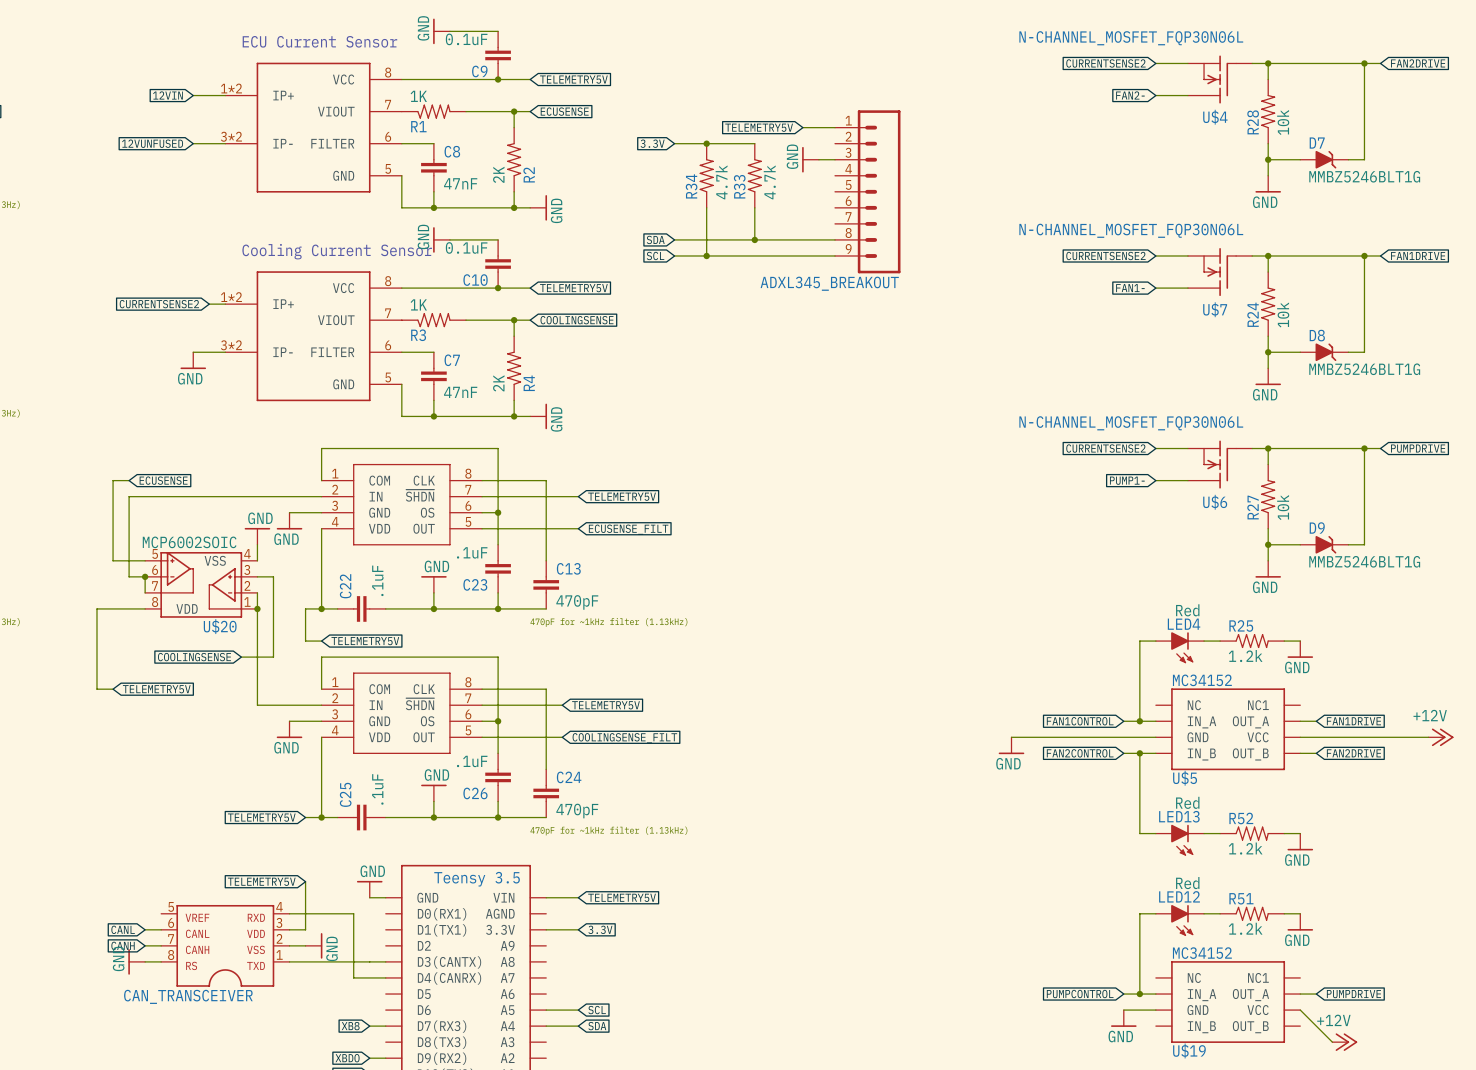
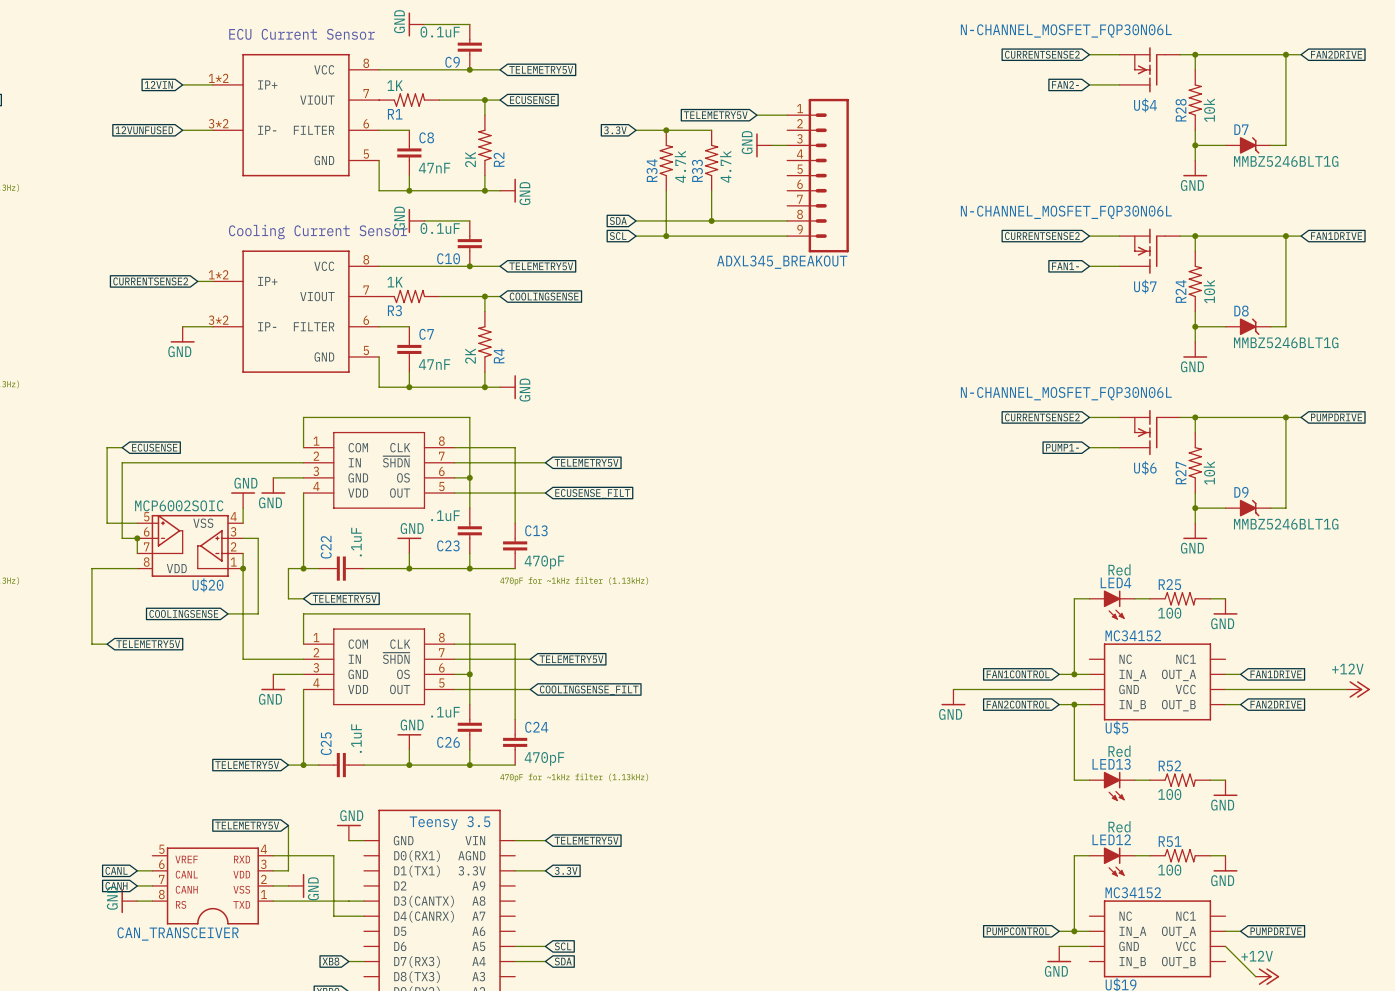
R25 value: 1.2k (1245, 656) -> 100 (1169, 613)
R52 value: 1.2k (1245, 848) -> 100 (1169, 794)
R51 value: 1.2k (1245, 928) -> 100 (1169, 870)

